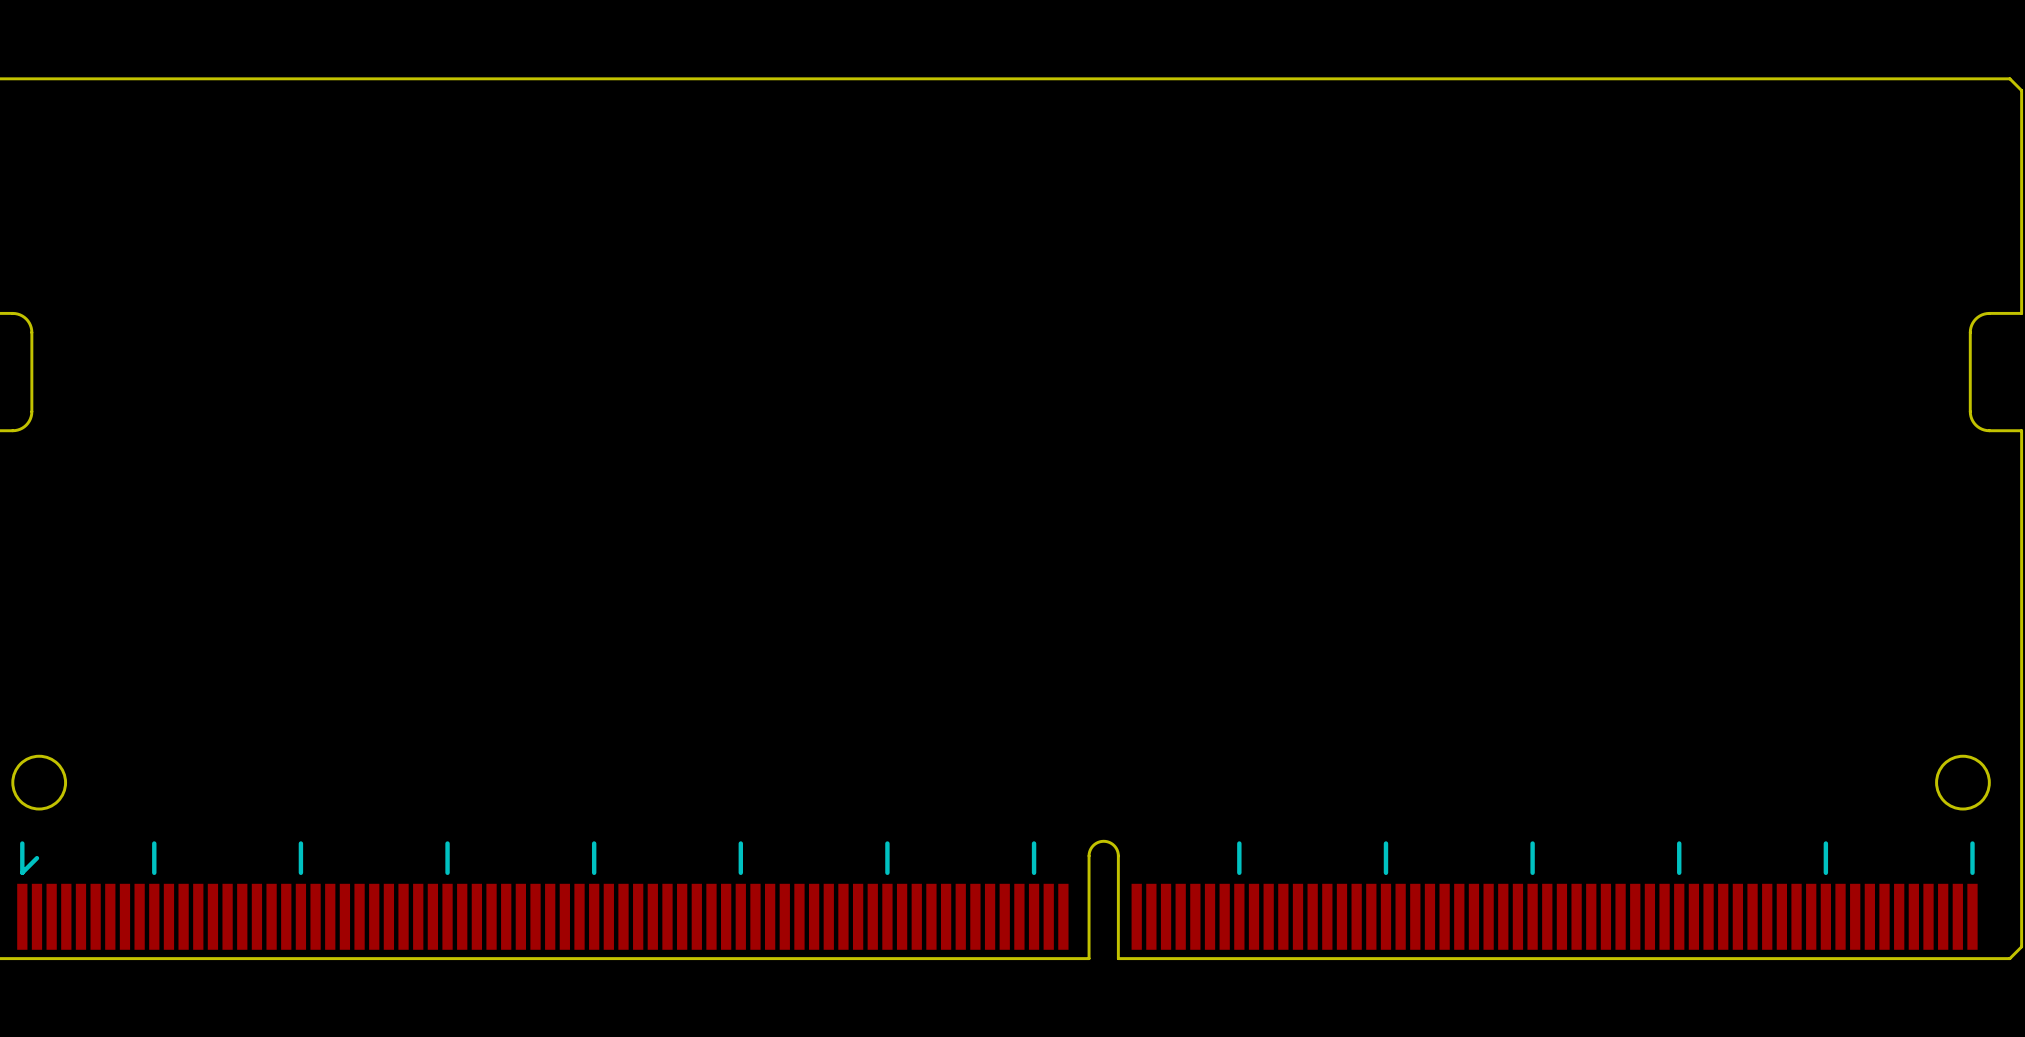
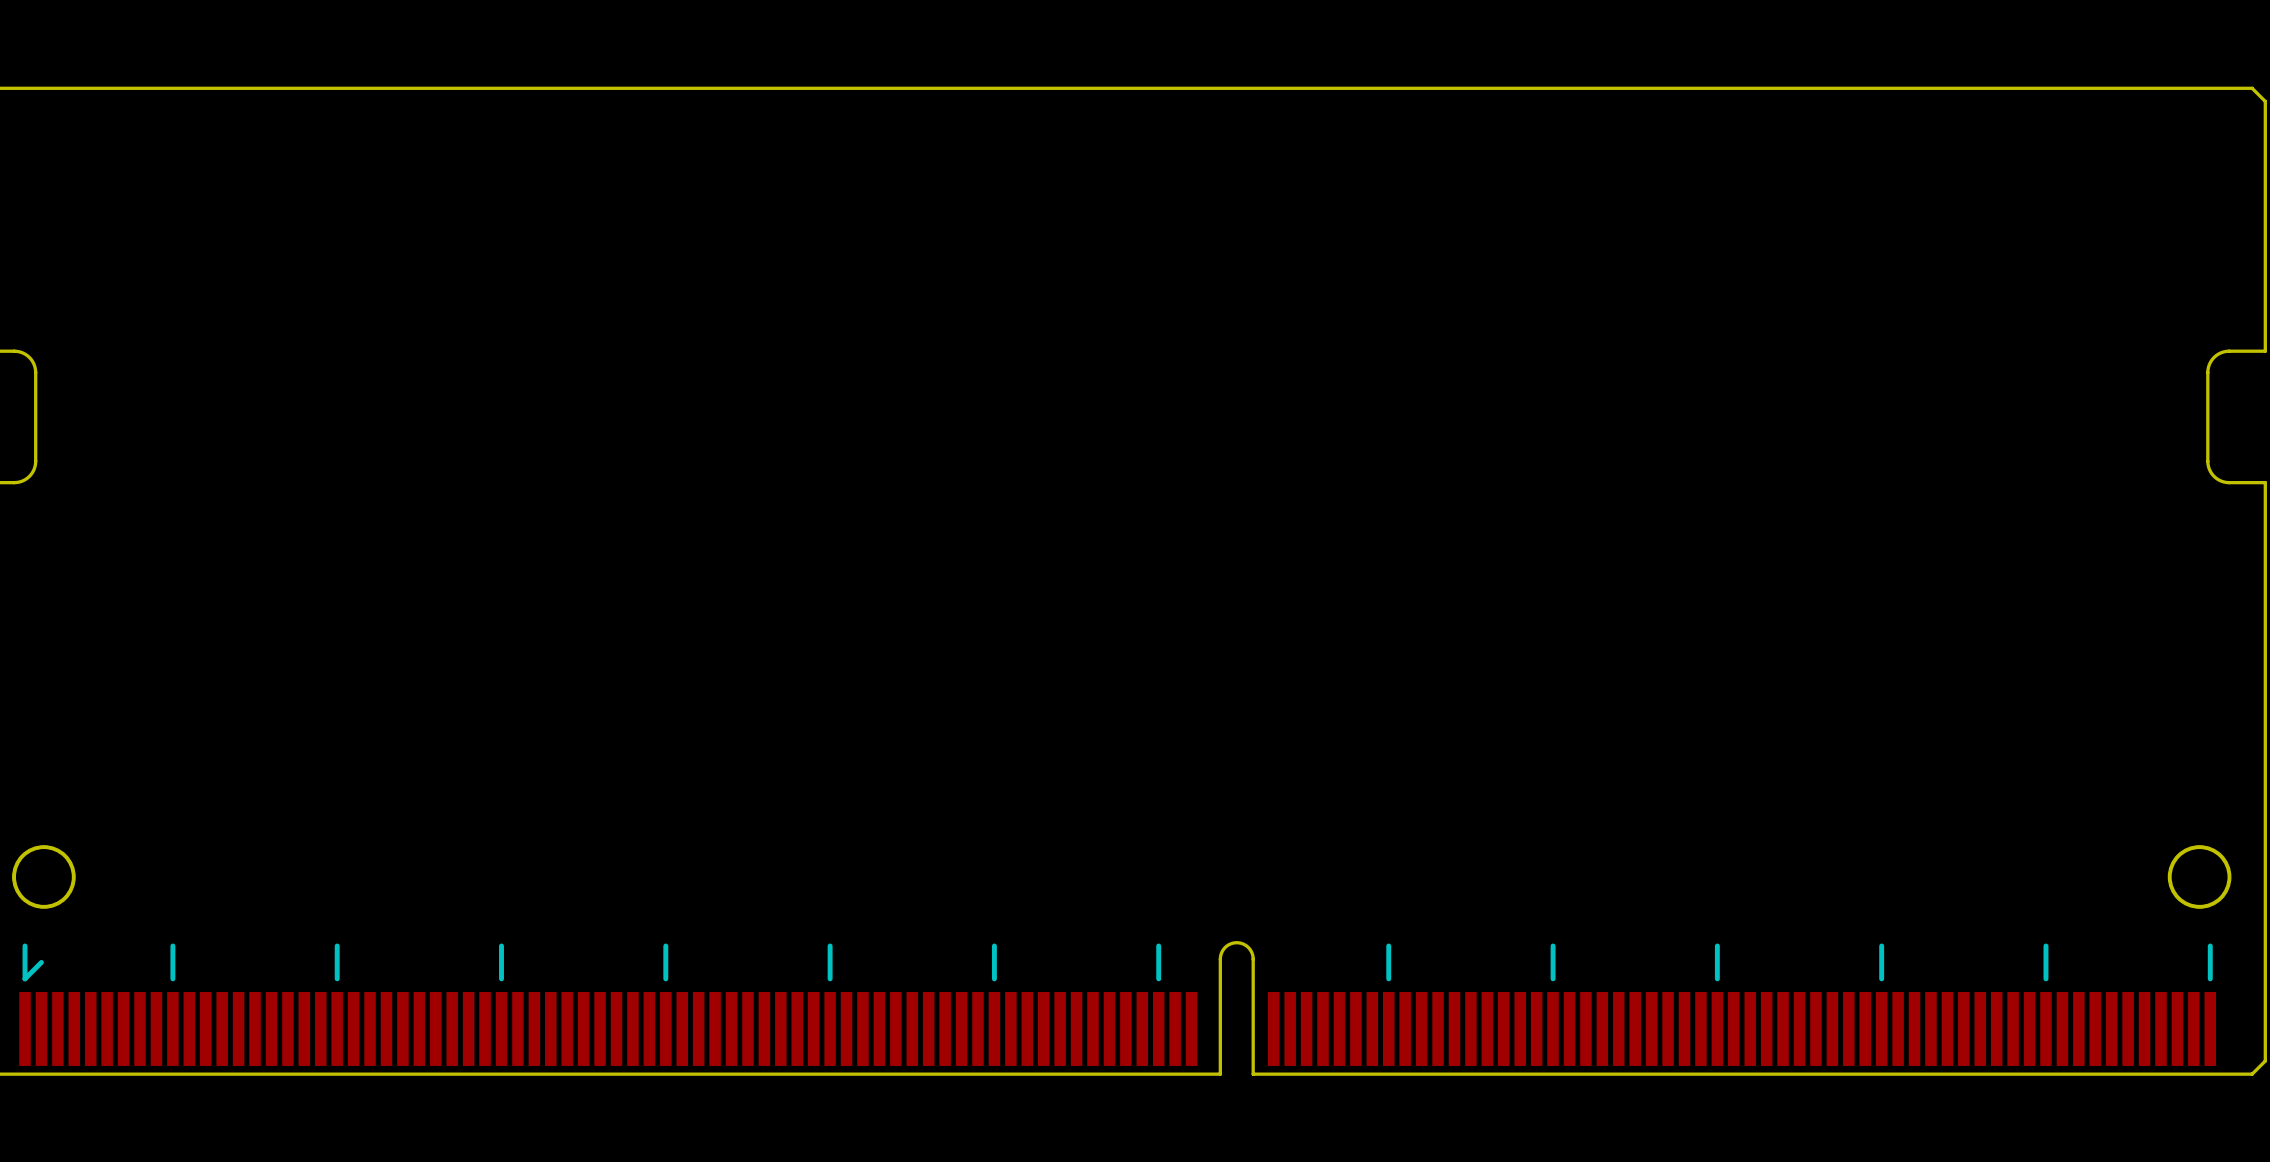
part: none -> (1121, 955)
part: (997, 895) -> none

